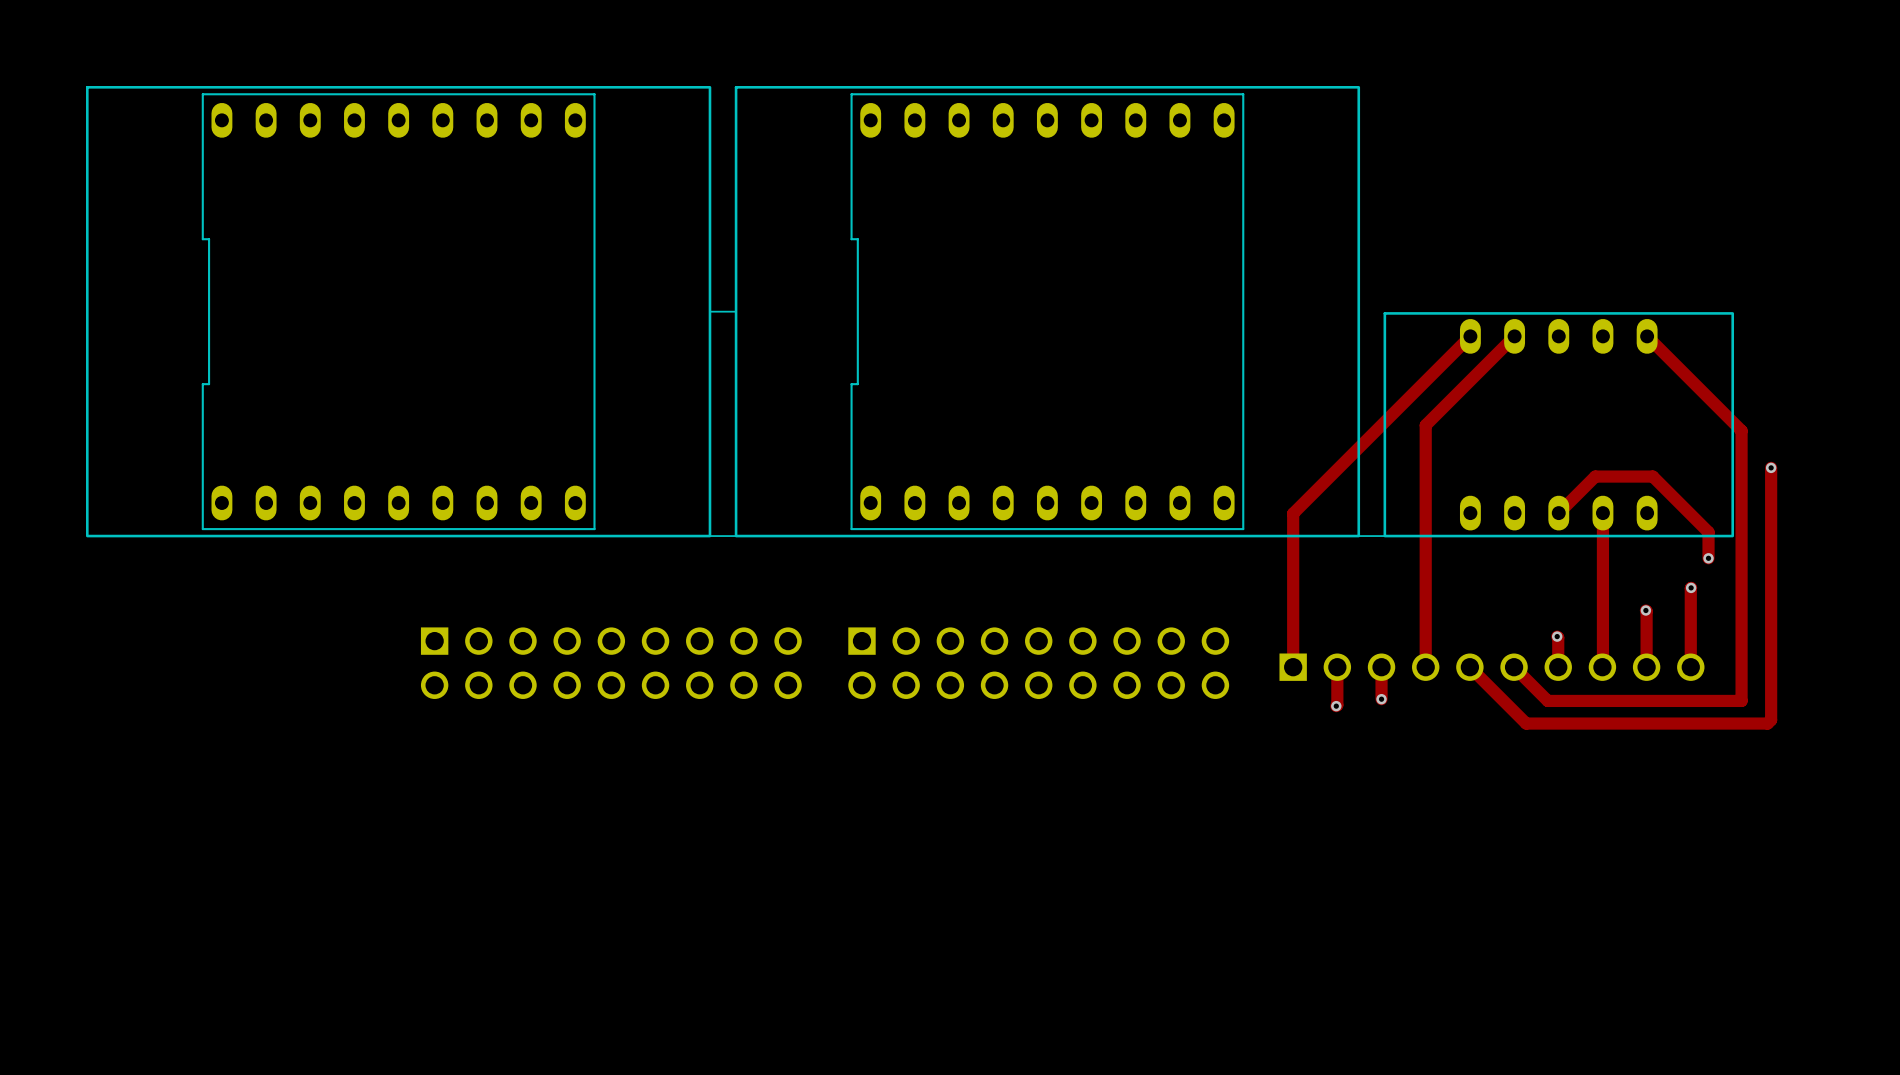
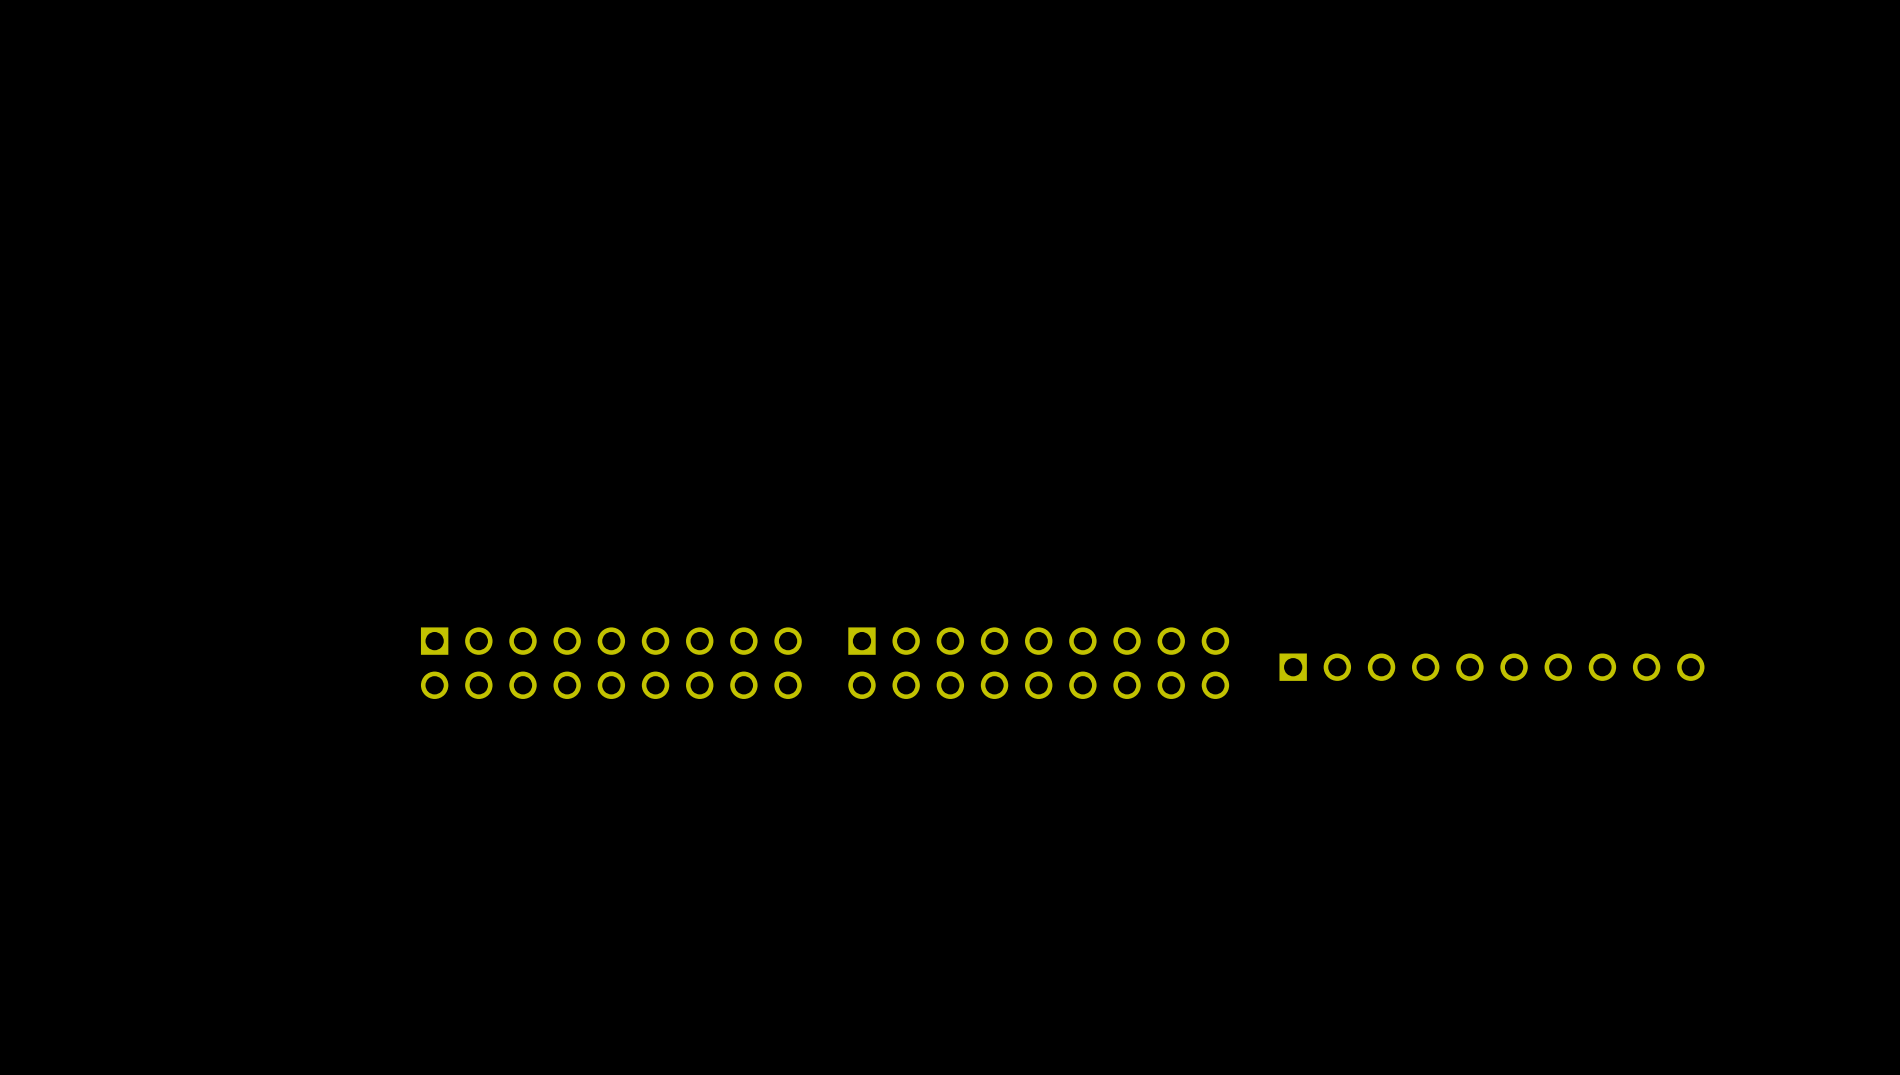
part: (910, 311) -> none
track: (1470, 336) (1293, 513) (1293, 667) -> none
track: (1514, 336) (1425, 425) (1425, 667) -> none
track: (1647, 336) (1741, 430) (1741, 700) (1547, 700) (1514, 667) -> none
track: (1771, 467) (1771, 720) (1767, 723) (1526, 723) (1469, 667) -> none
via: (1771, 467) -> none
track: (1558, 513) (1595, 476) (1652, 476) (1708, 532) (1708, 558) -> none
track: (1602, 513) (1602, 667) -> none
via: (1708, 558) -> none
track: (1691, 587) (1690, 667) -> none
via: (1691, 587) -> none
track: (1645, 610) (1646, 667) -> none
via: (1645, 610) -> none
track: (1557, 636) (1558, 667) -> none
via: (1557, 636) -> none
track: (1337, 667) (1336, 706) -> none
track: (1381, 667) (1381, 699) -> none
via: (1381, 699) -> none
via: (1336, 706) -> none

